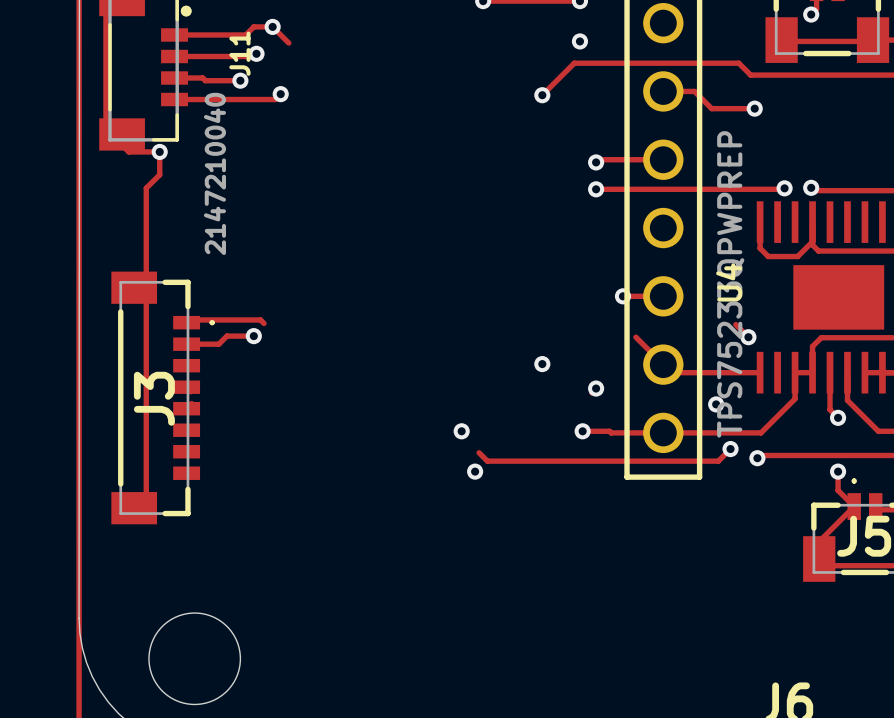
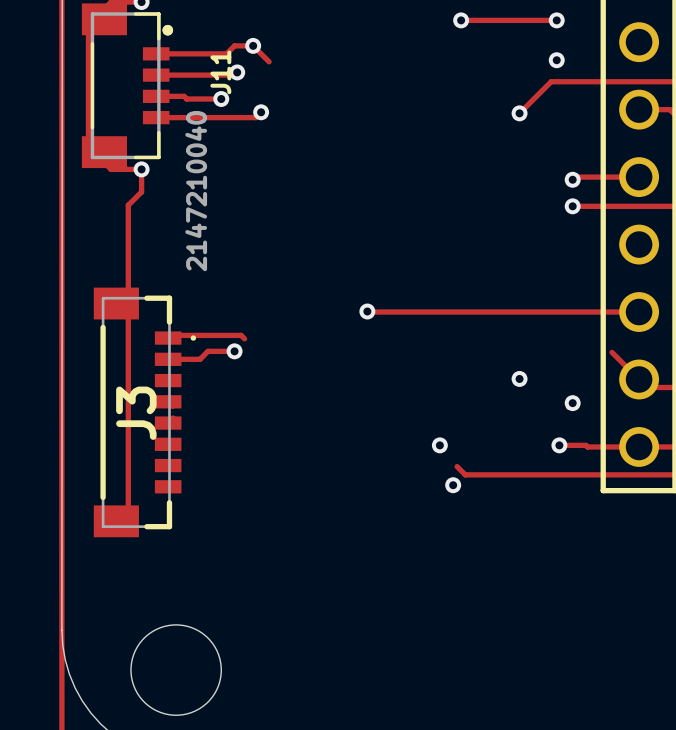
track: none -> (367, 311) (599, 312)
via: none -> (367, 311)
via: (622, 296) -> none

